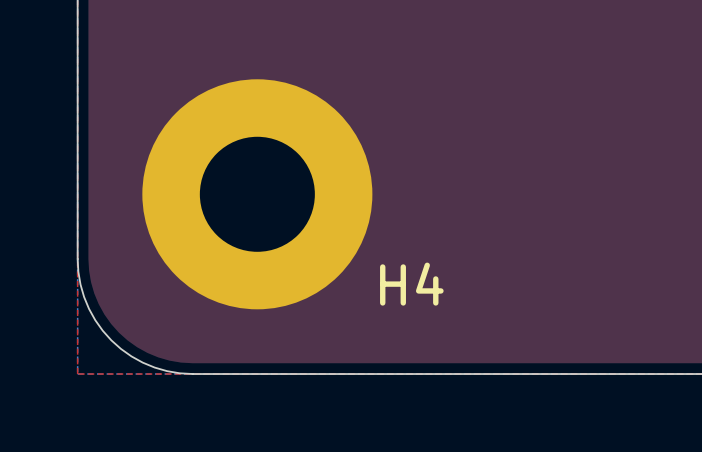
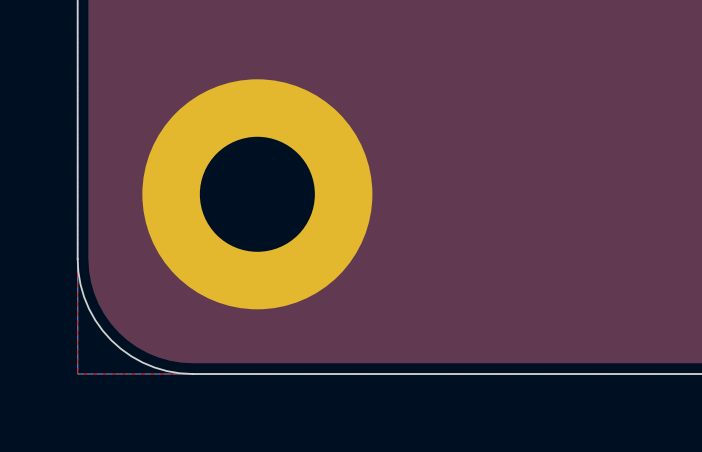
H4 name: H4 (411, 284) -> none

